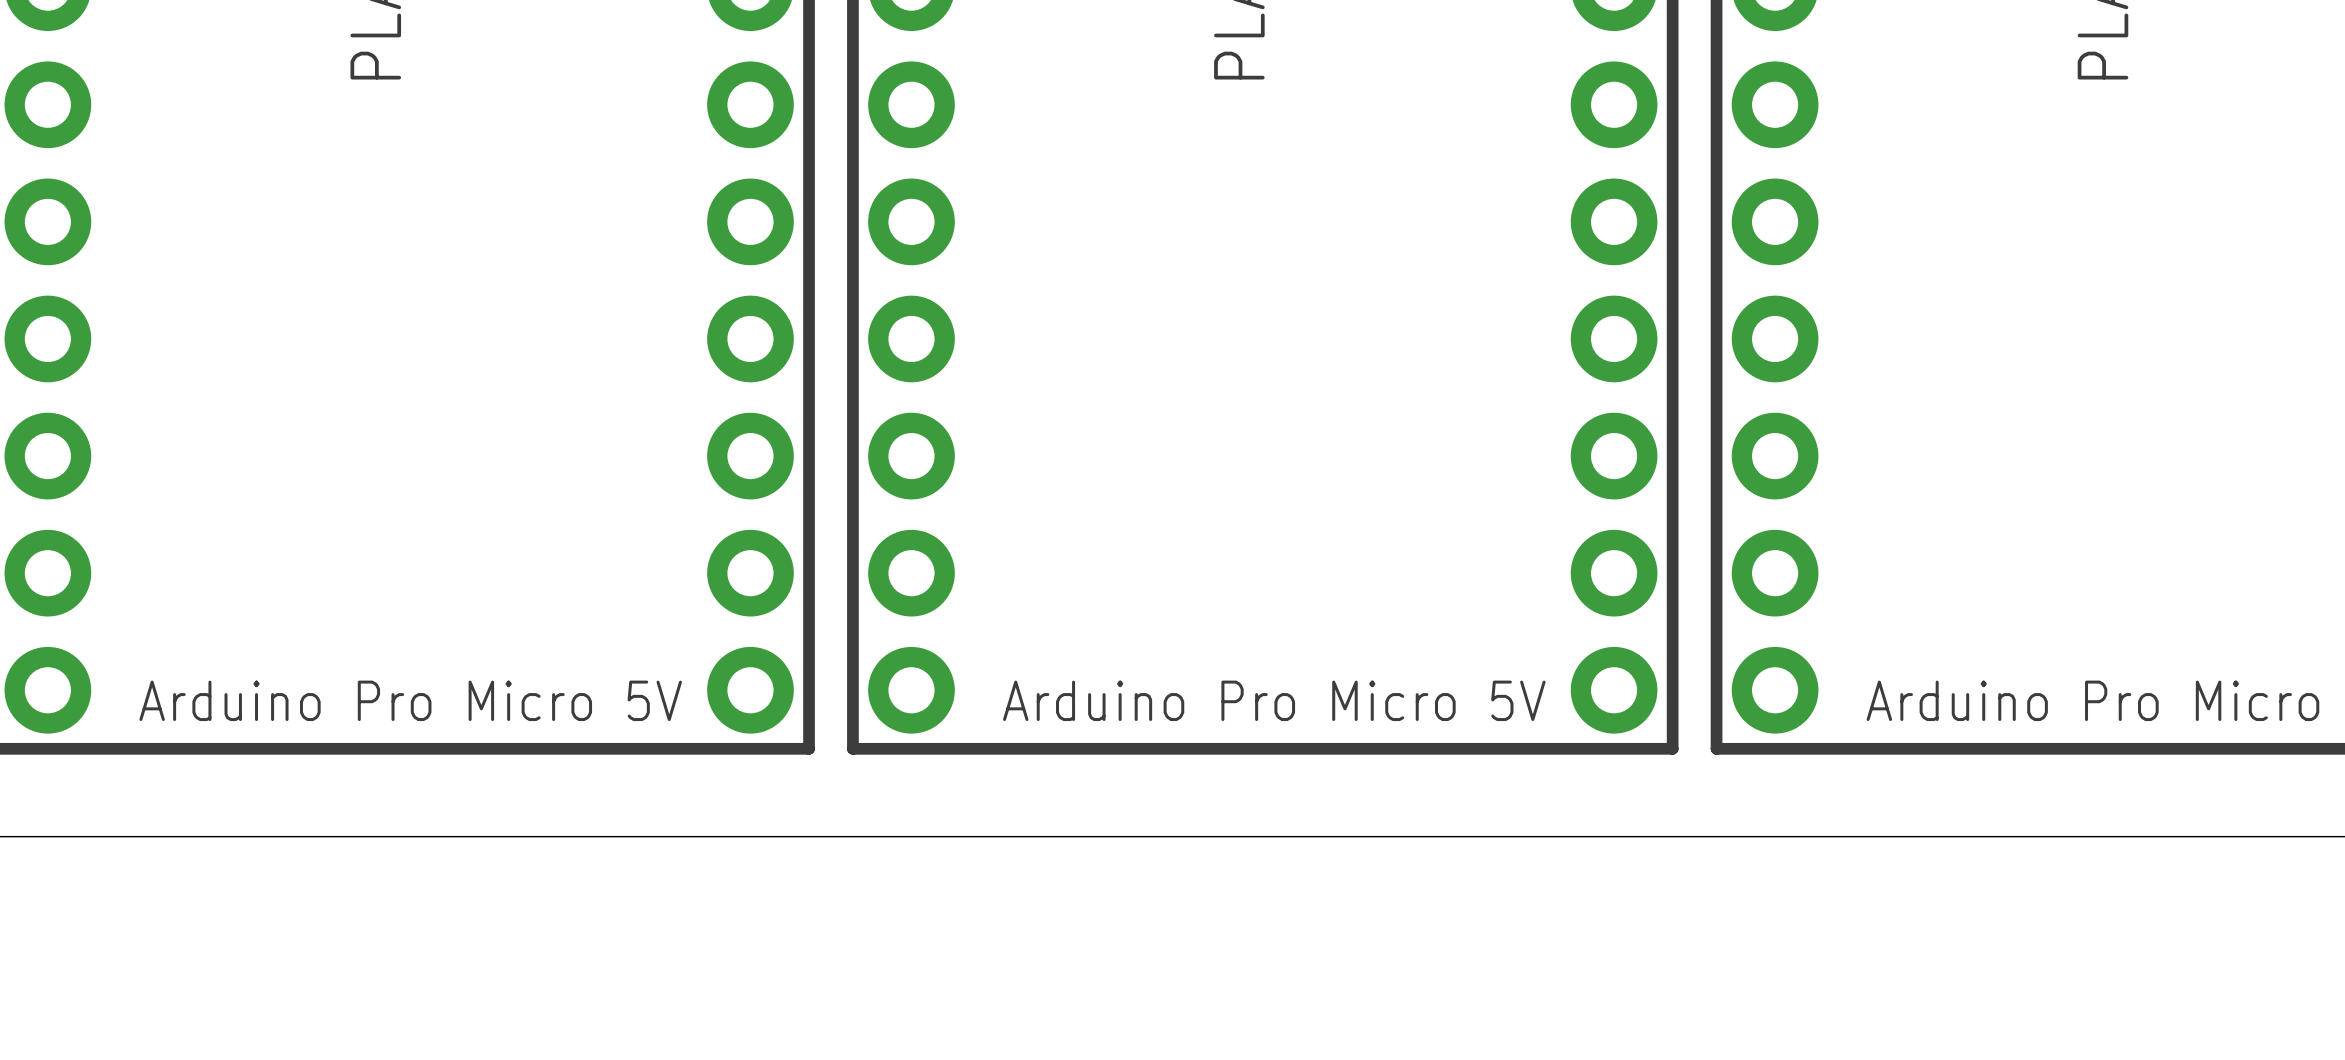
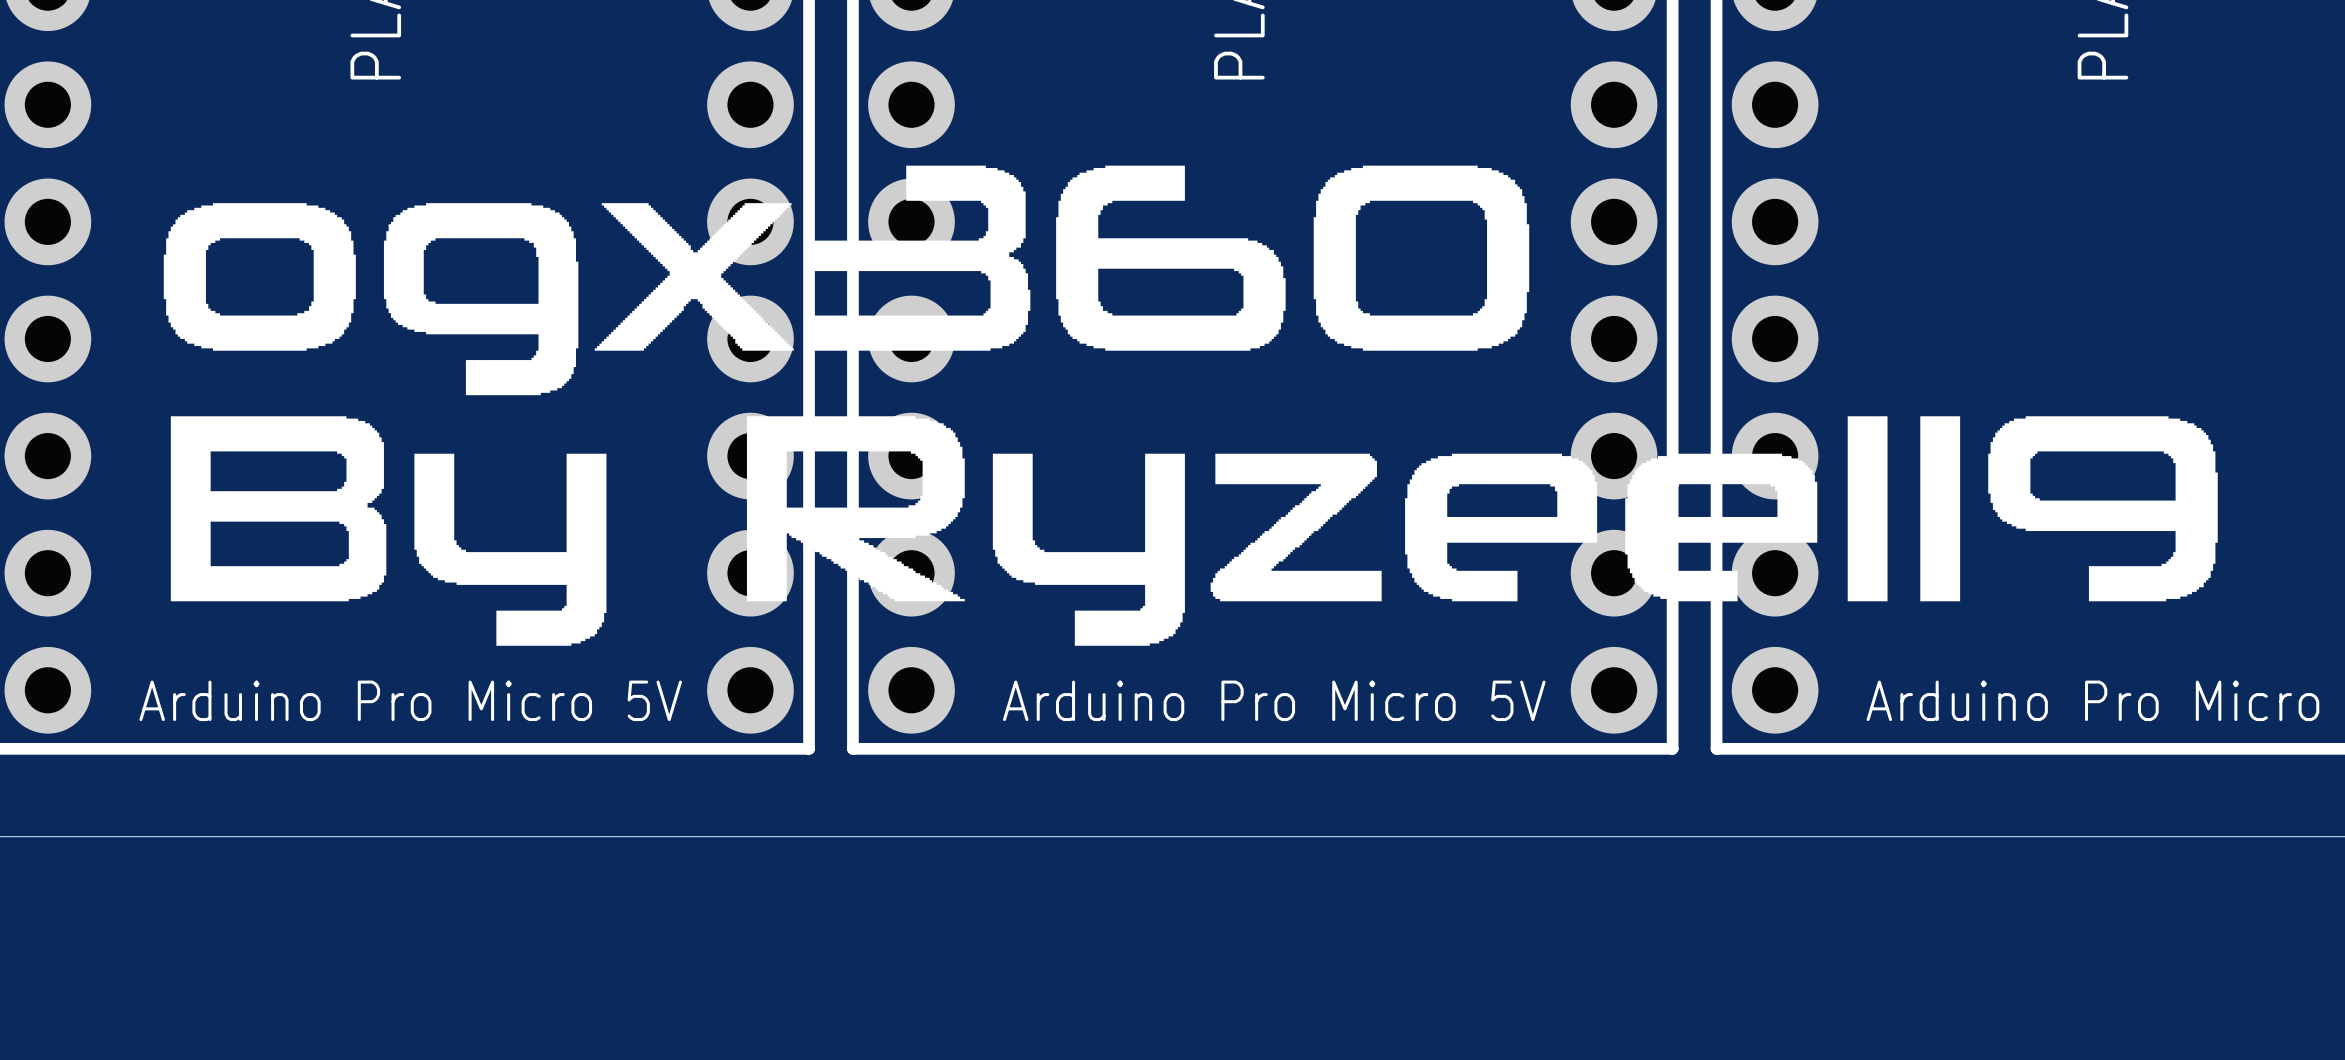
drawing: none -> [163, 165, 1530, 396]
drawing: none -> [170, 416, 607, 646]
drawing: none -> [746, 416, 2218, 646]

